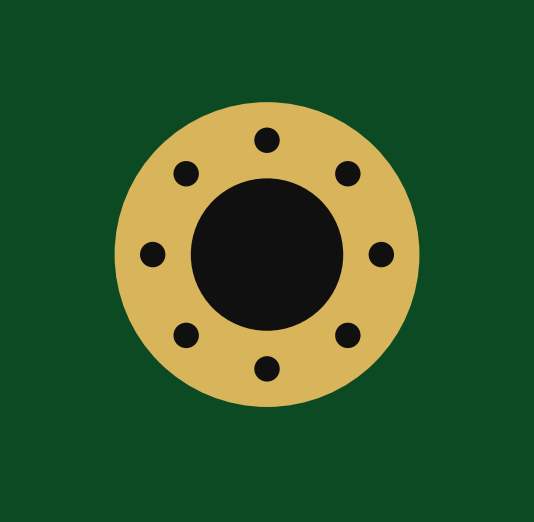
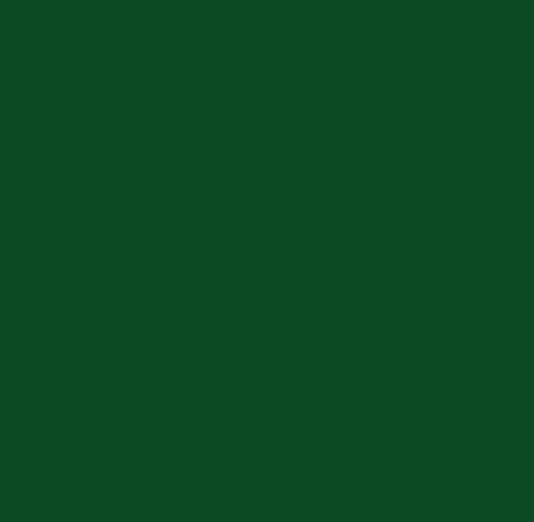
part: (267, 254) -> none

